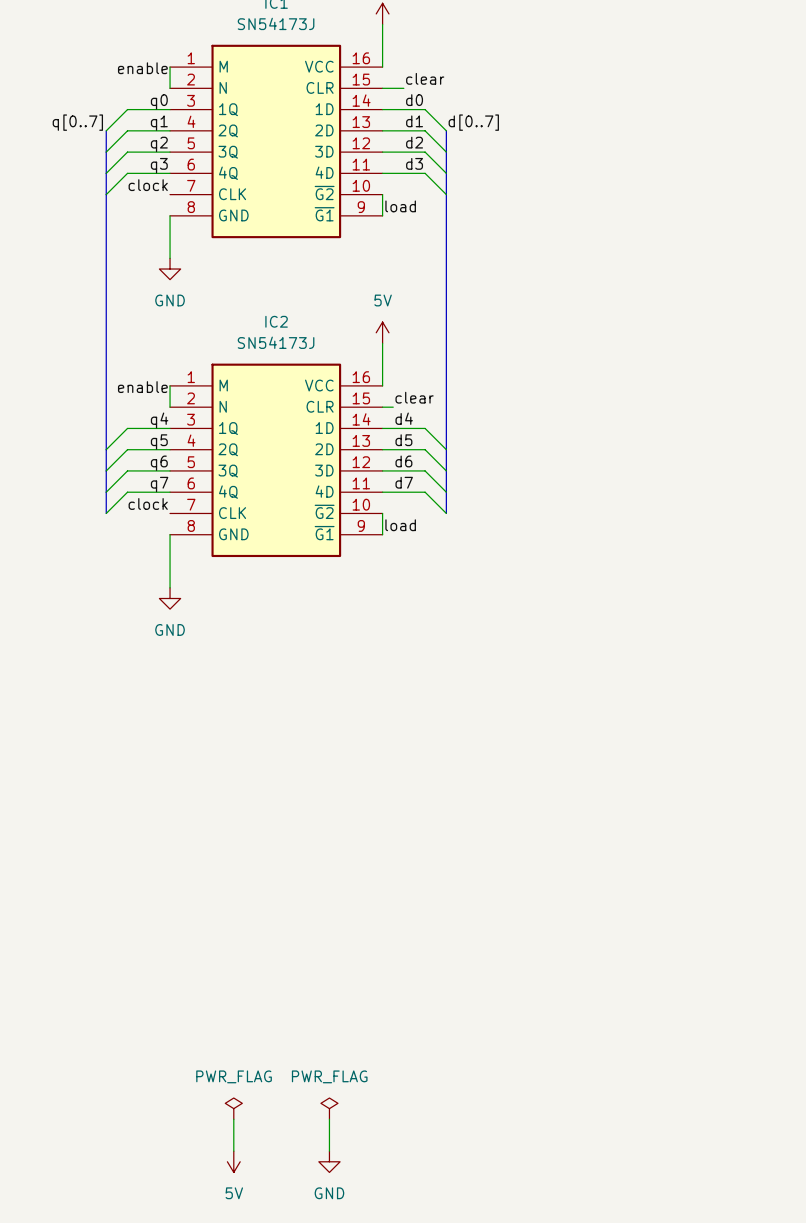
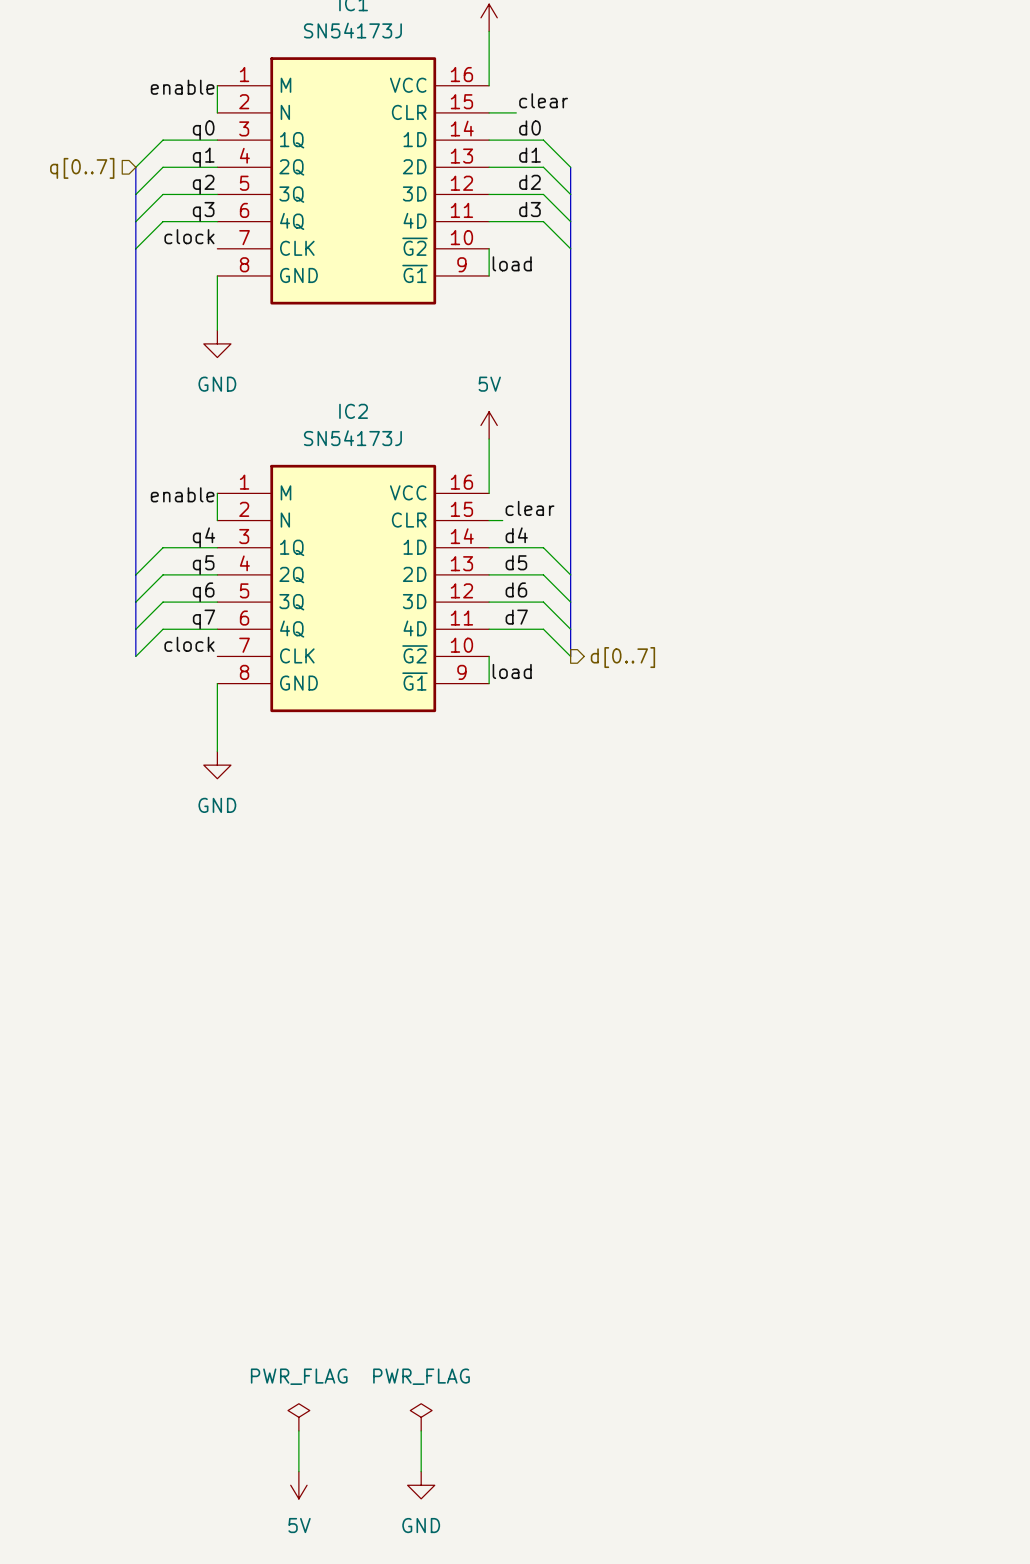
label: q[0..7] (77, 122) -> none
label: d[0..7] (473, 122) -> none
hierarchical label: none -> q[0..7] (82, 168)
hierarchical label: none -> d[0..7] (622, 657)

